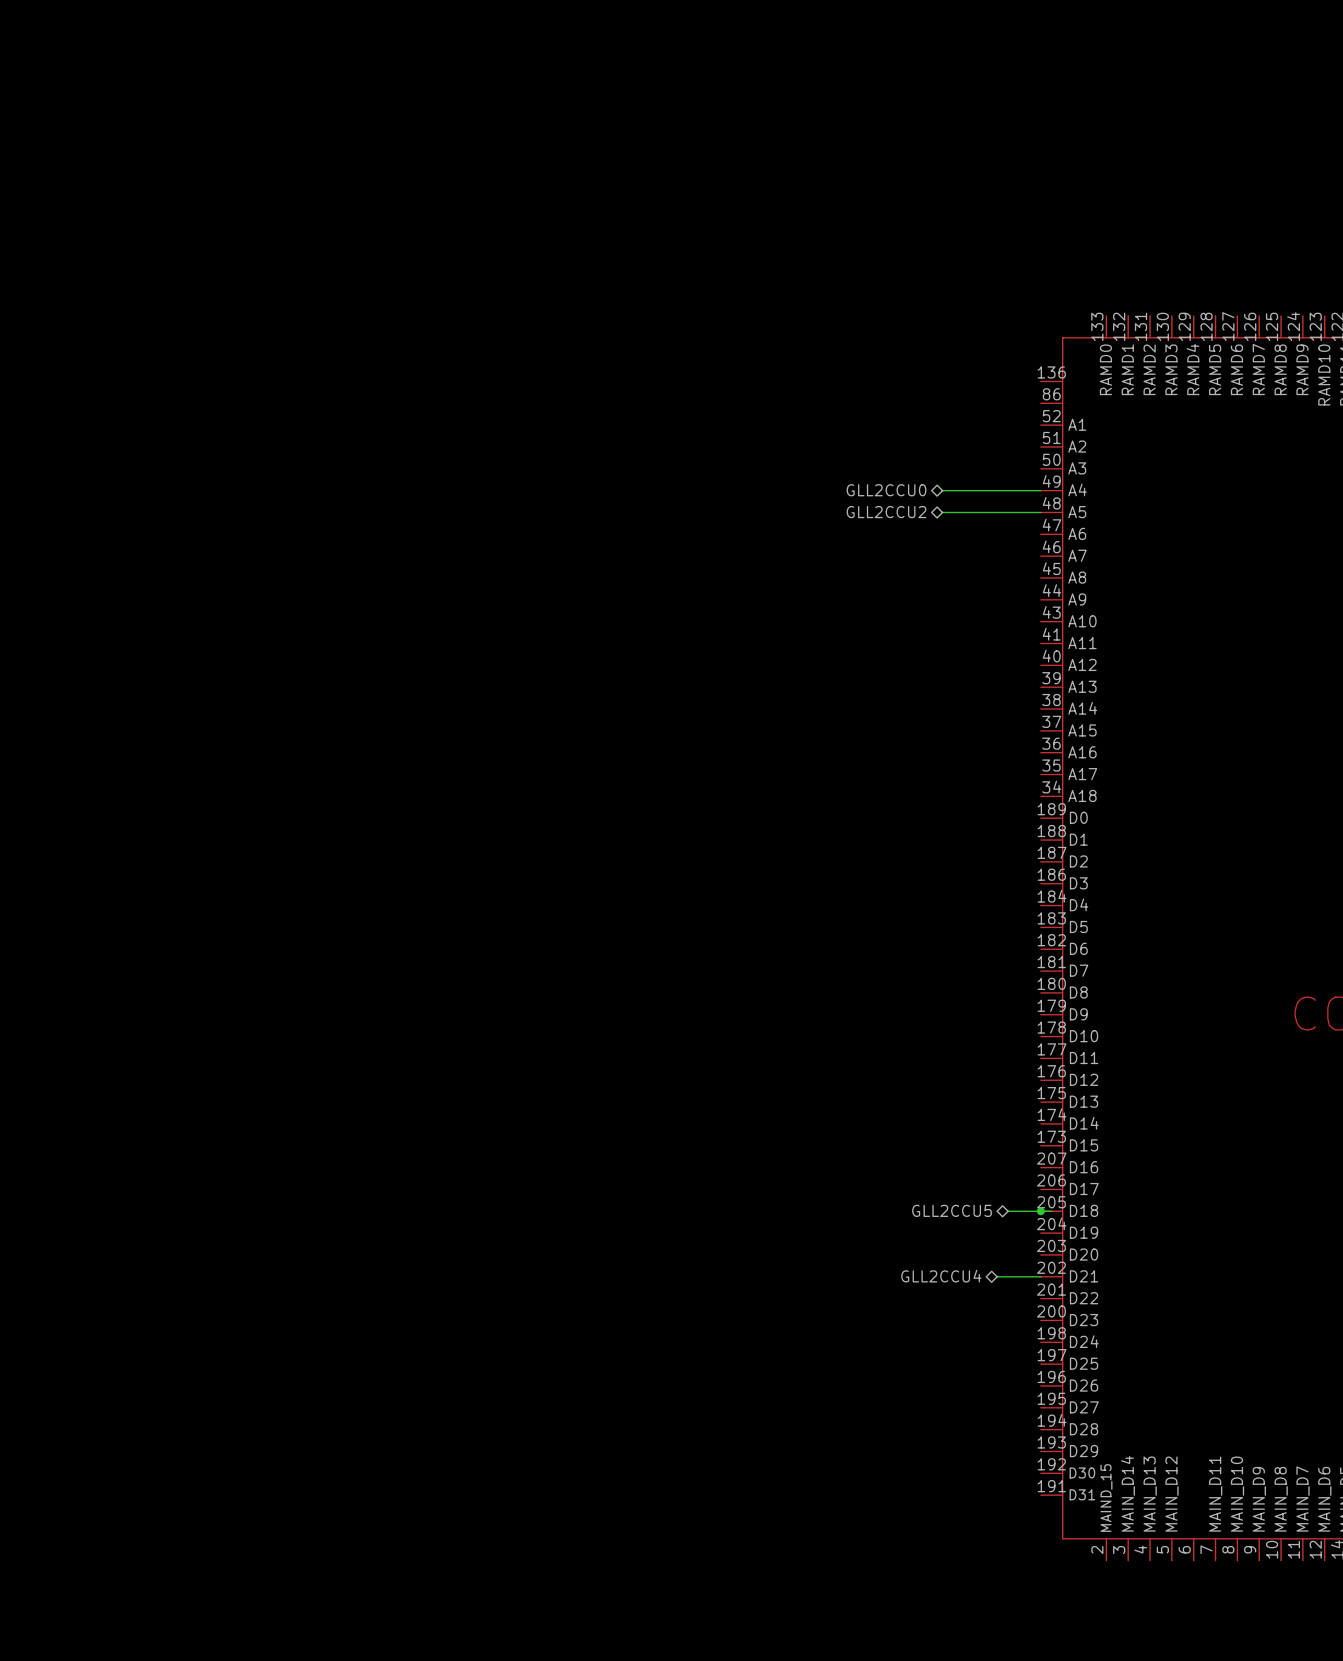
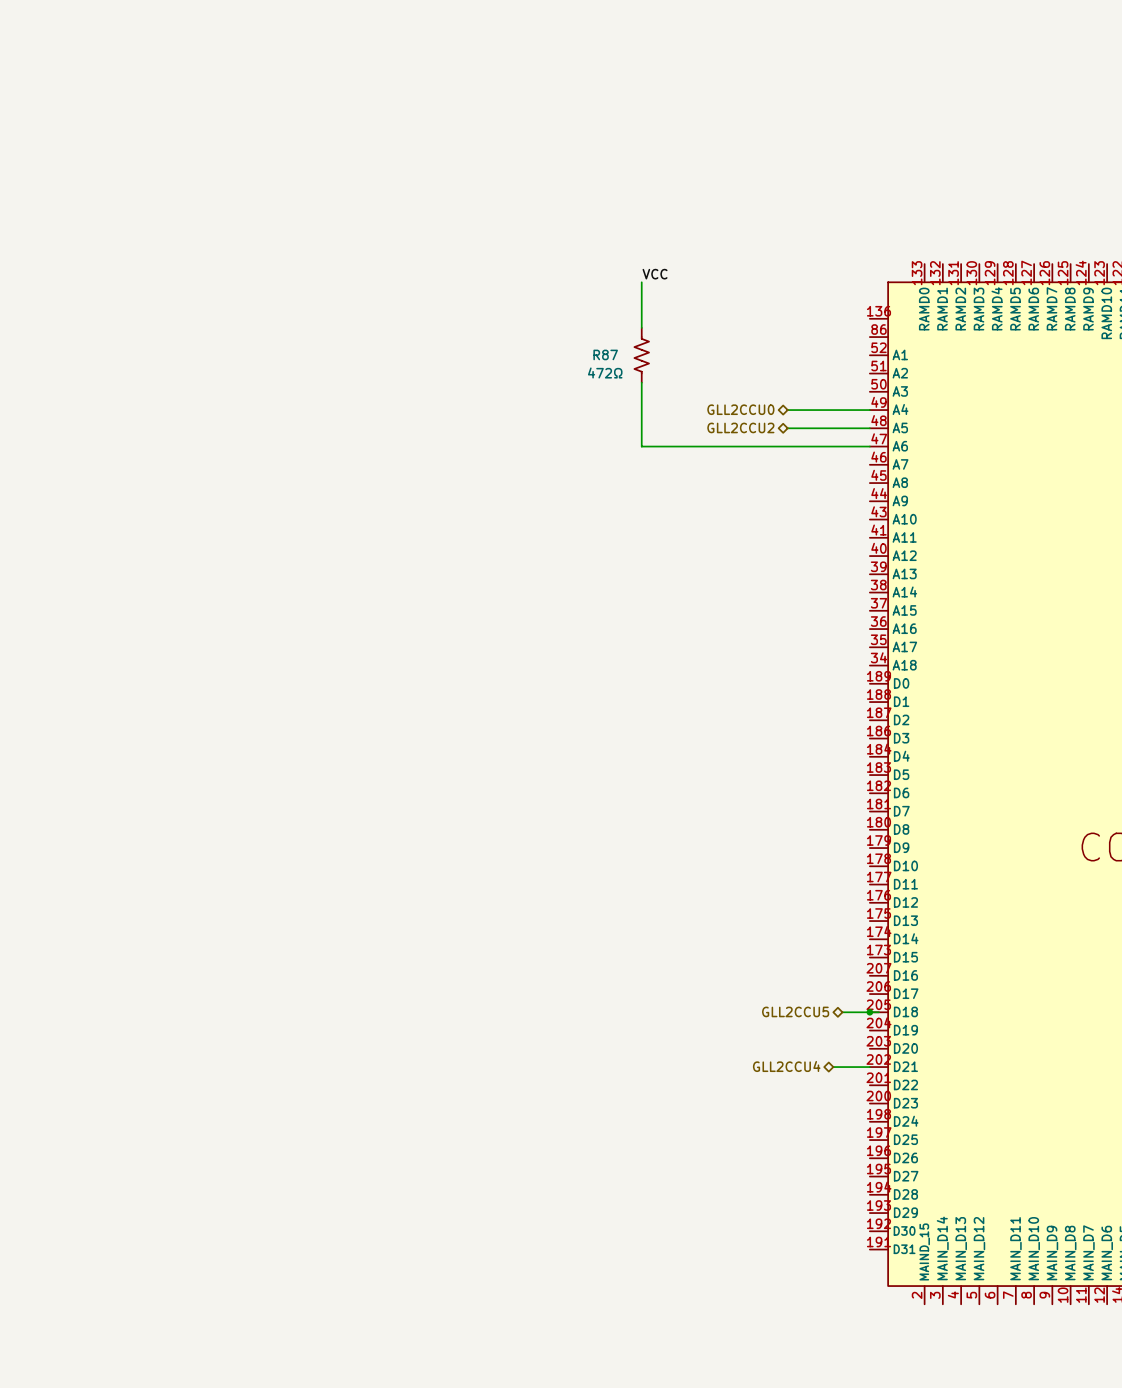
label: none -> VCC (655, 274)
wire: none -> (641, 282) (641, 327)
R87: none -> 472Ω (641, 355)
wire: none -> (641, 382) (641, 446) (869, 446)

